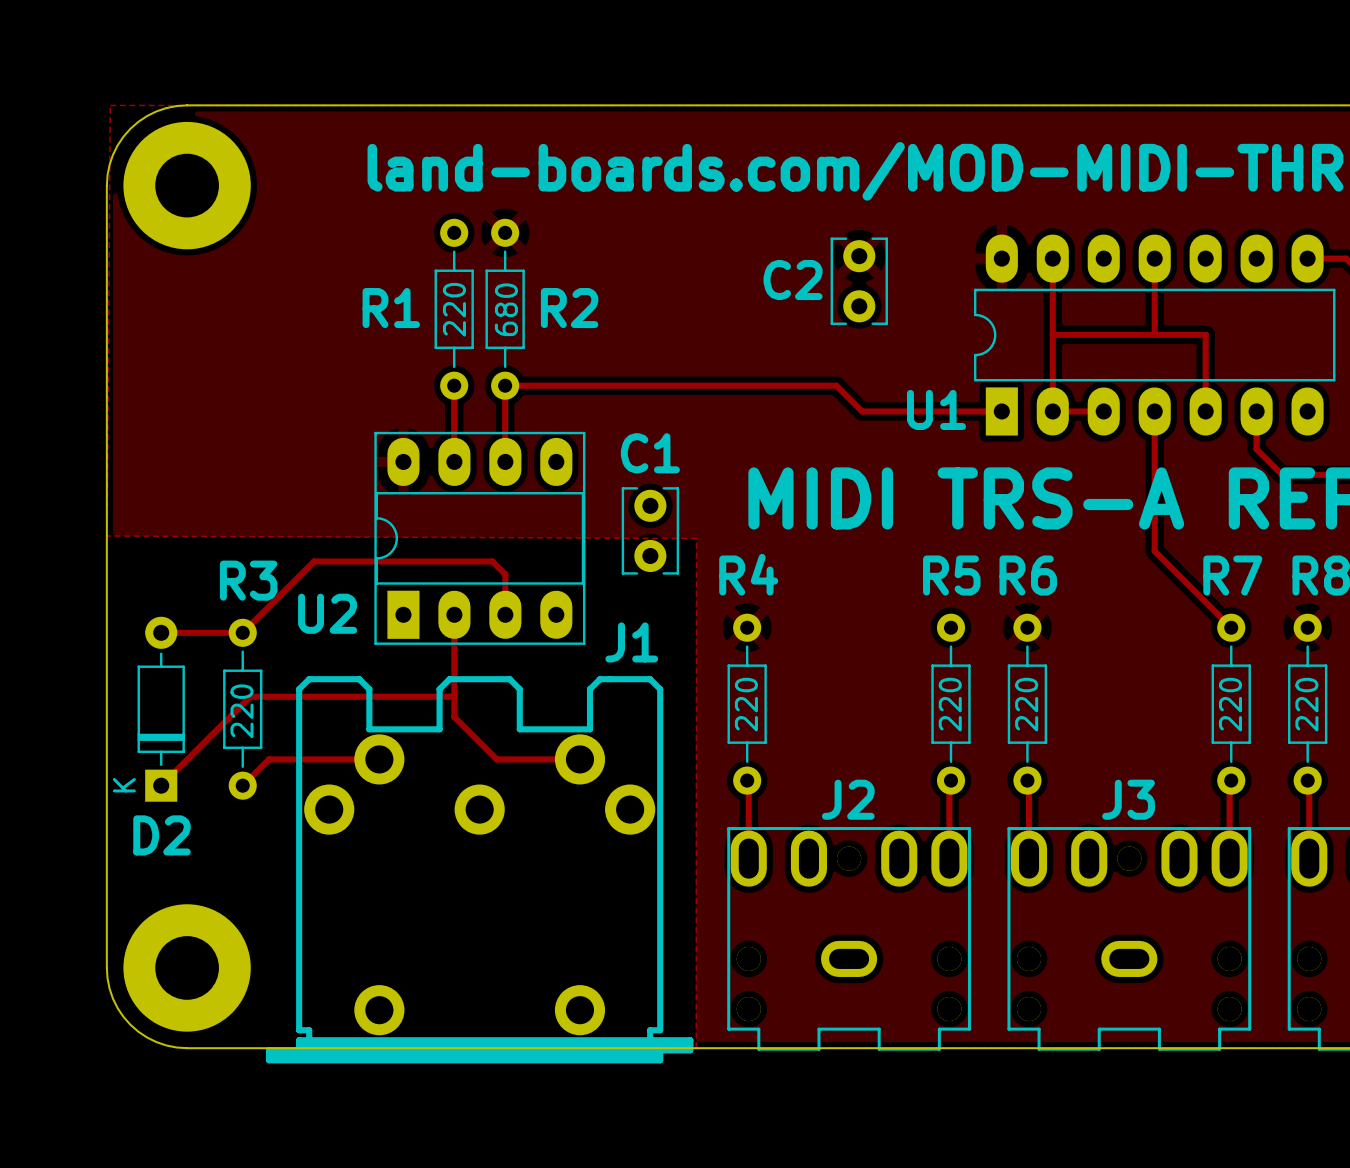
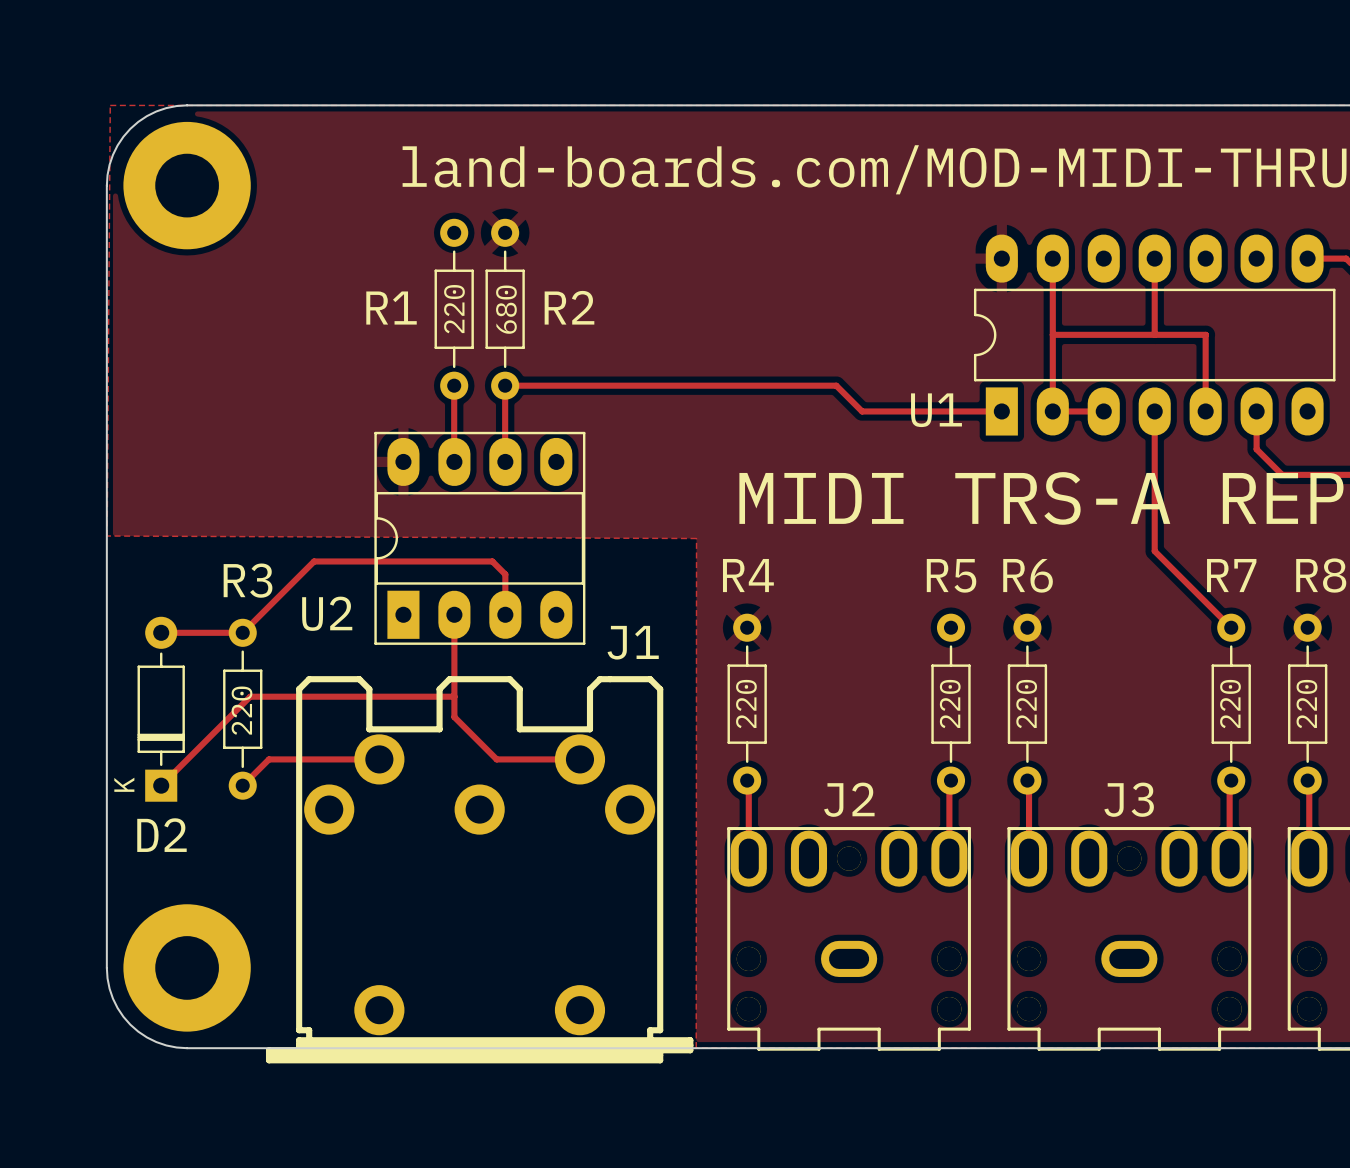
C2: (859, 281) -> none
C1: (650, 530) -> none

